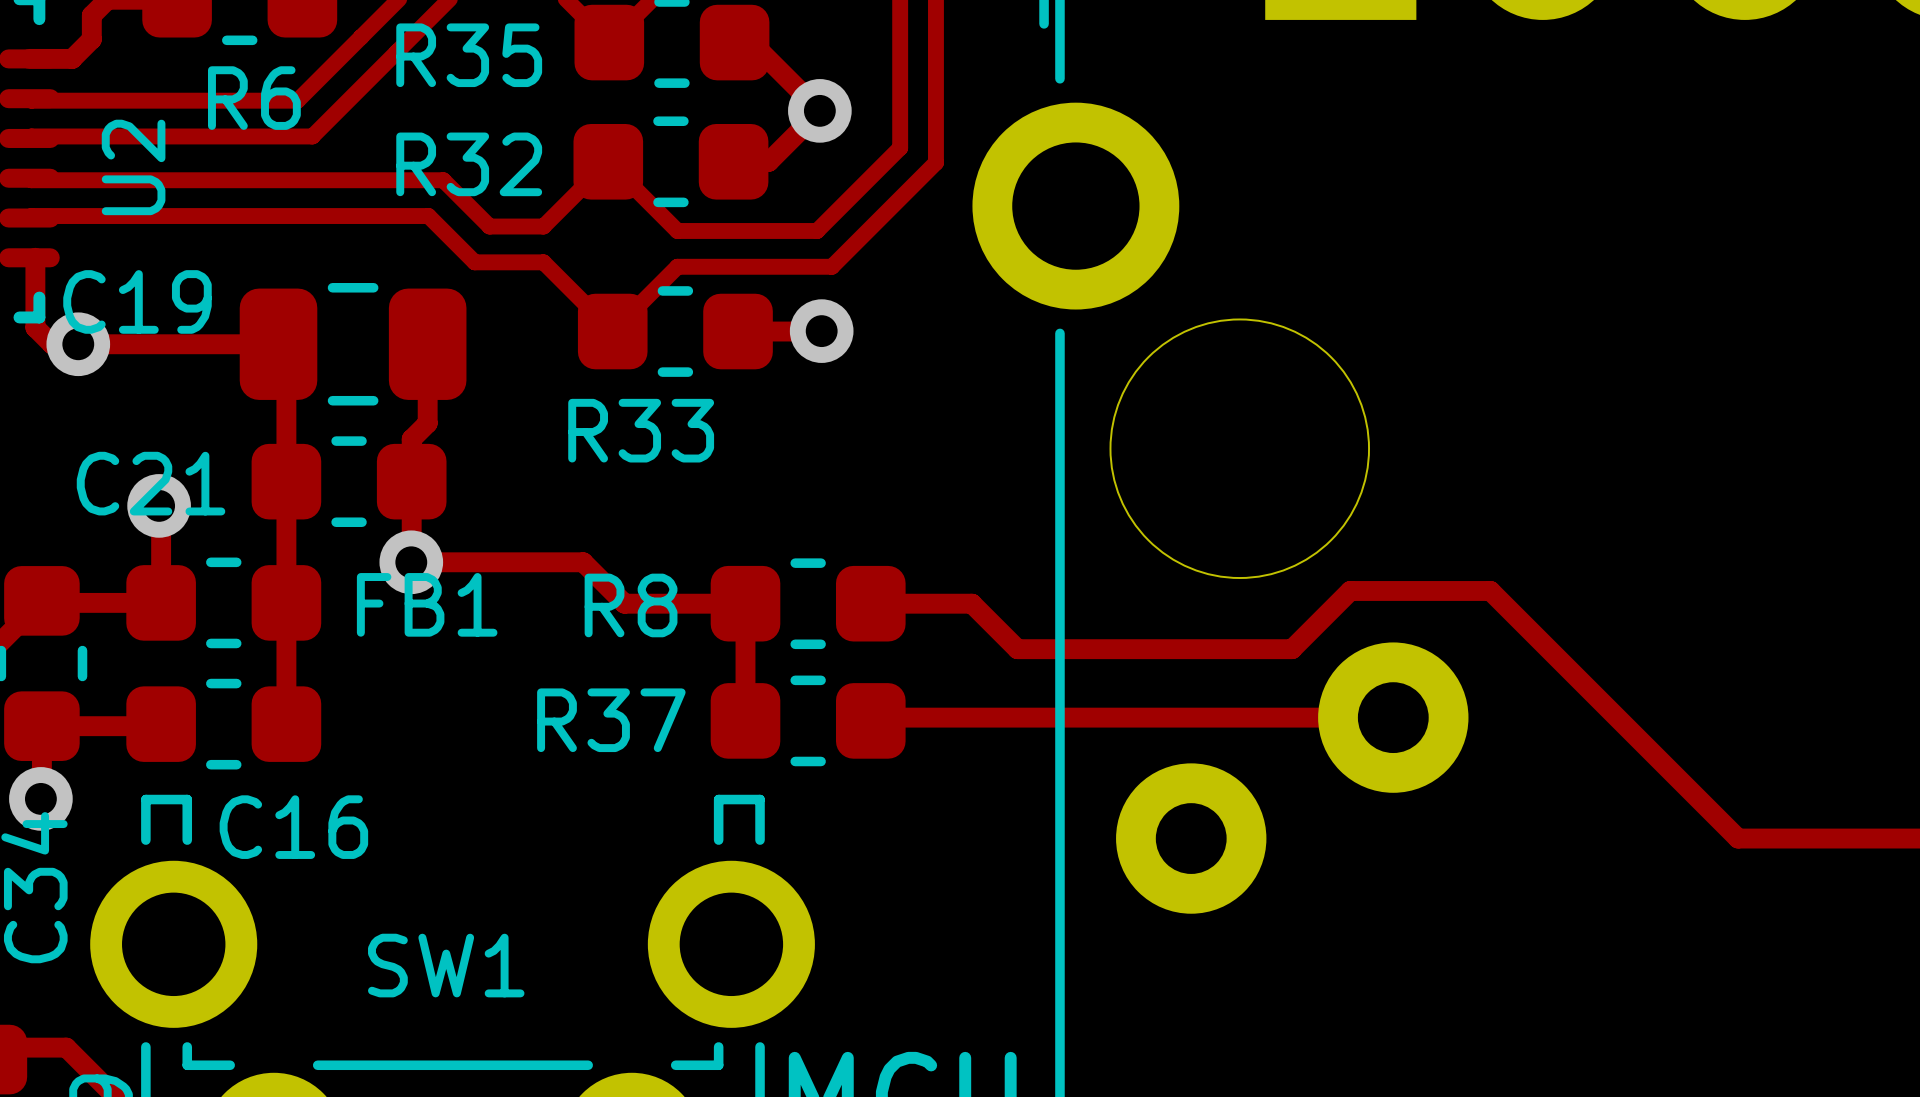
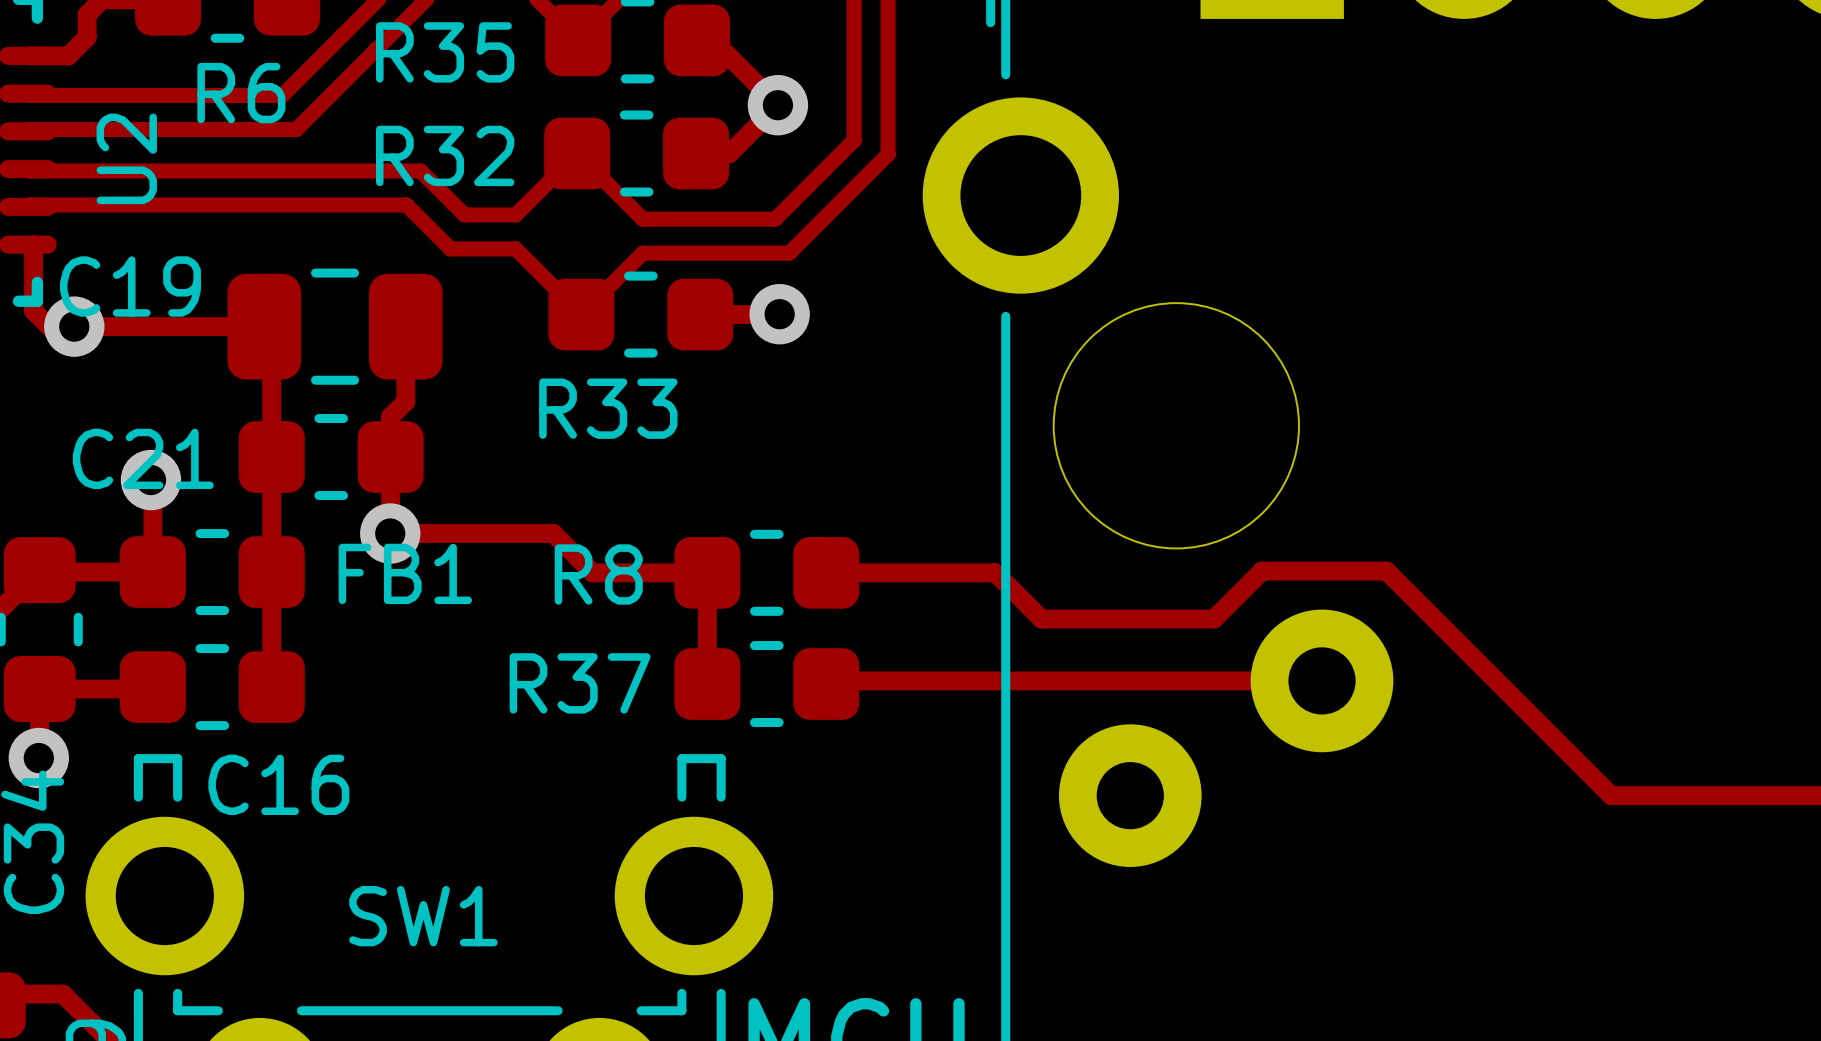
track: (972, 603) (1017, 649) (1292, 649) (1350, 590) (1490, 590) (1738, 838) -> (922, 572) (995, 572) (1041, 619) (1214, 619) (1262, 571) (1386, 571) (1611, 795) (1649, 795)

